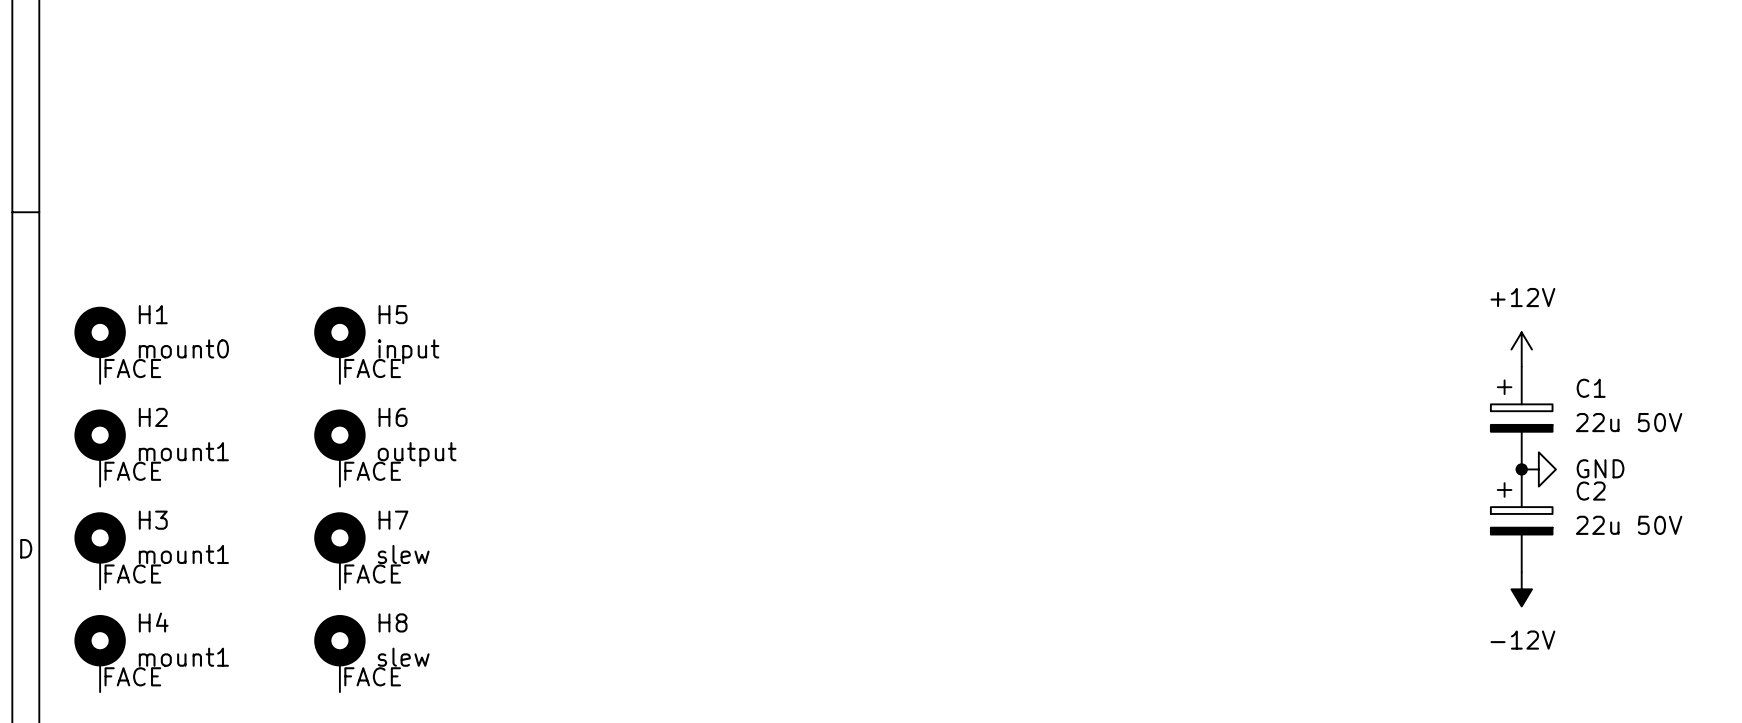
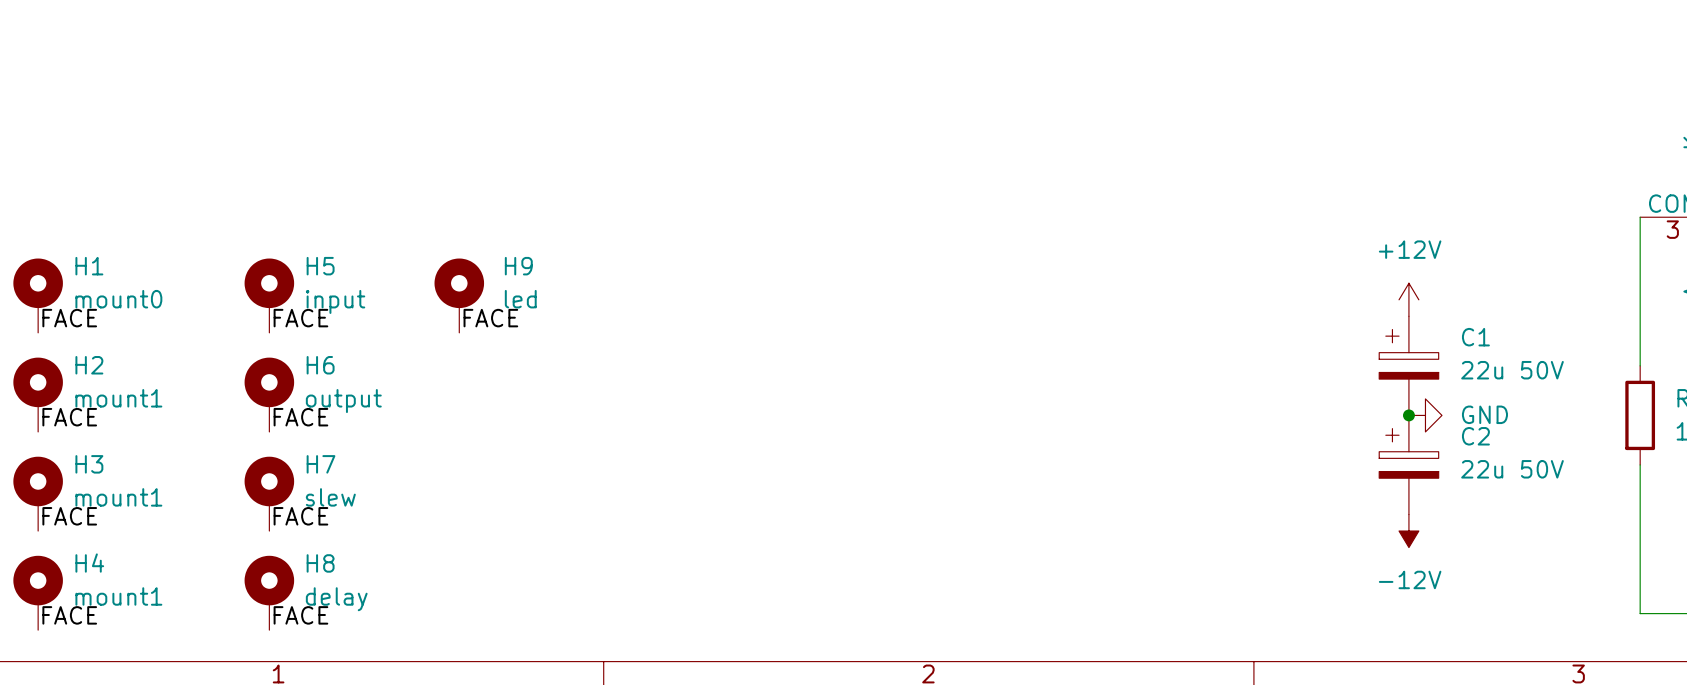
H9: none -> led (459, 295)
label: none -> FACE (490, 318)
H8 value: slew (403, 657) -> delay (336, 599)

